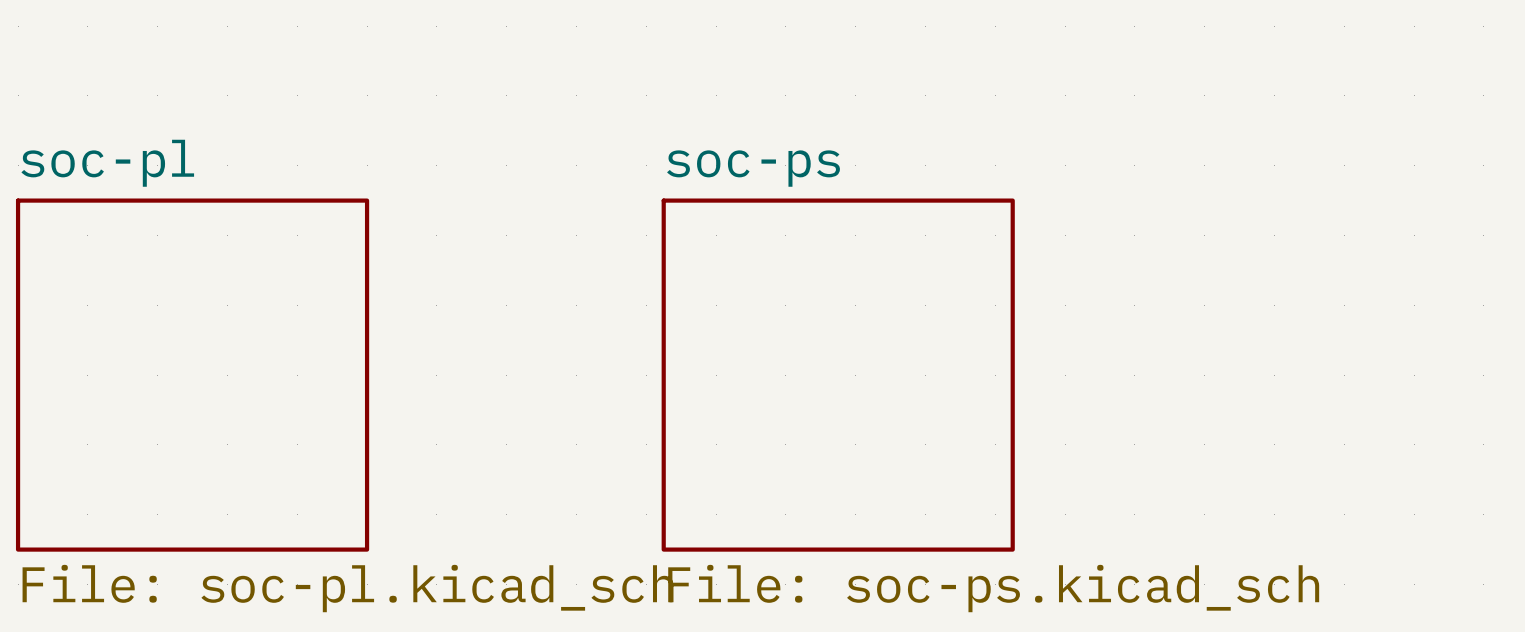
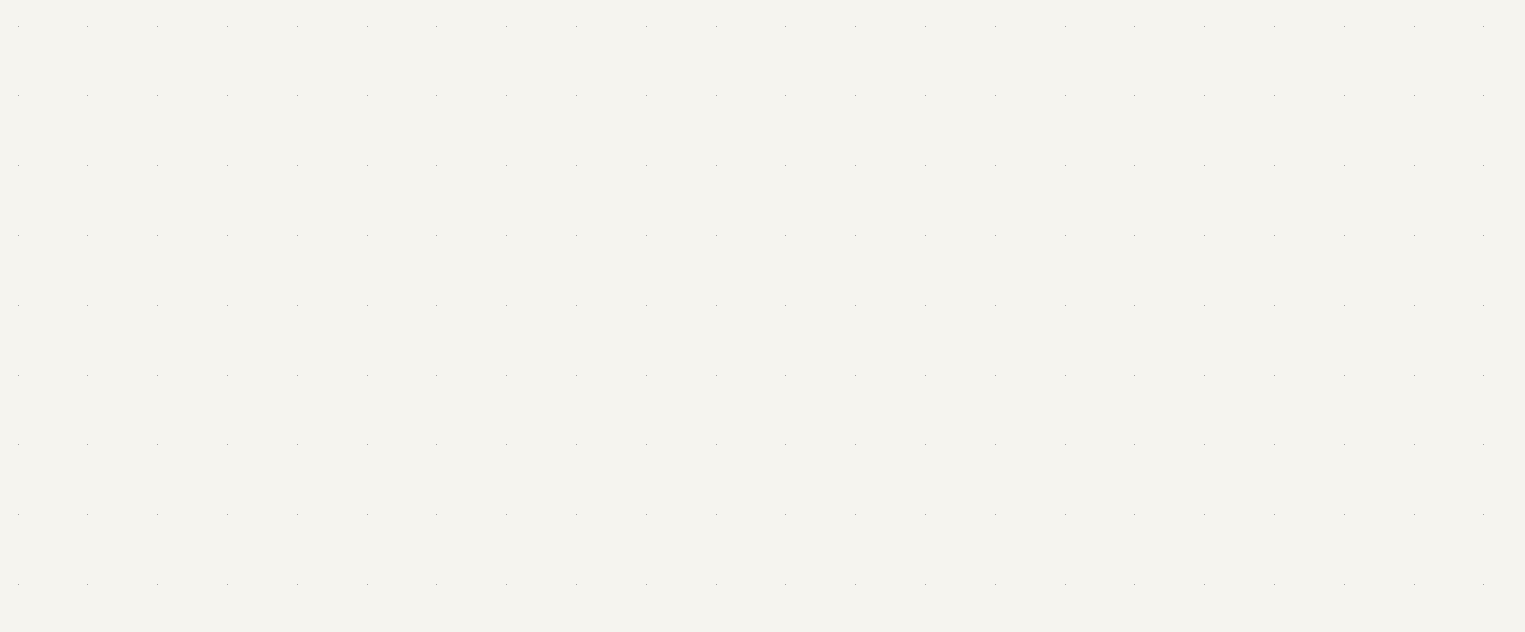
sheet soc-pl: File: soc-pl.kicad_sch (192, 375) -> none
sheet soc-ps: File: soc-ps.kicad_sch (838, 375) -> none

